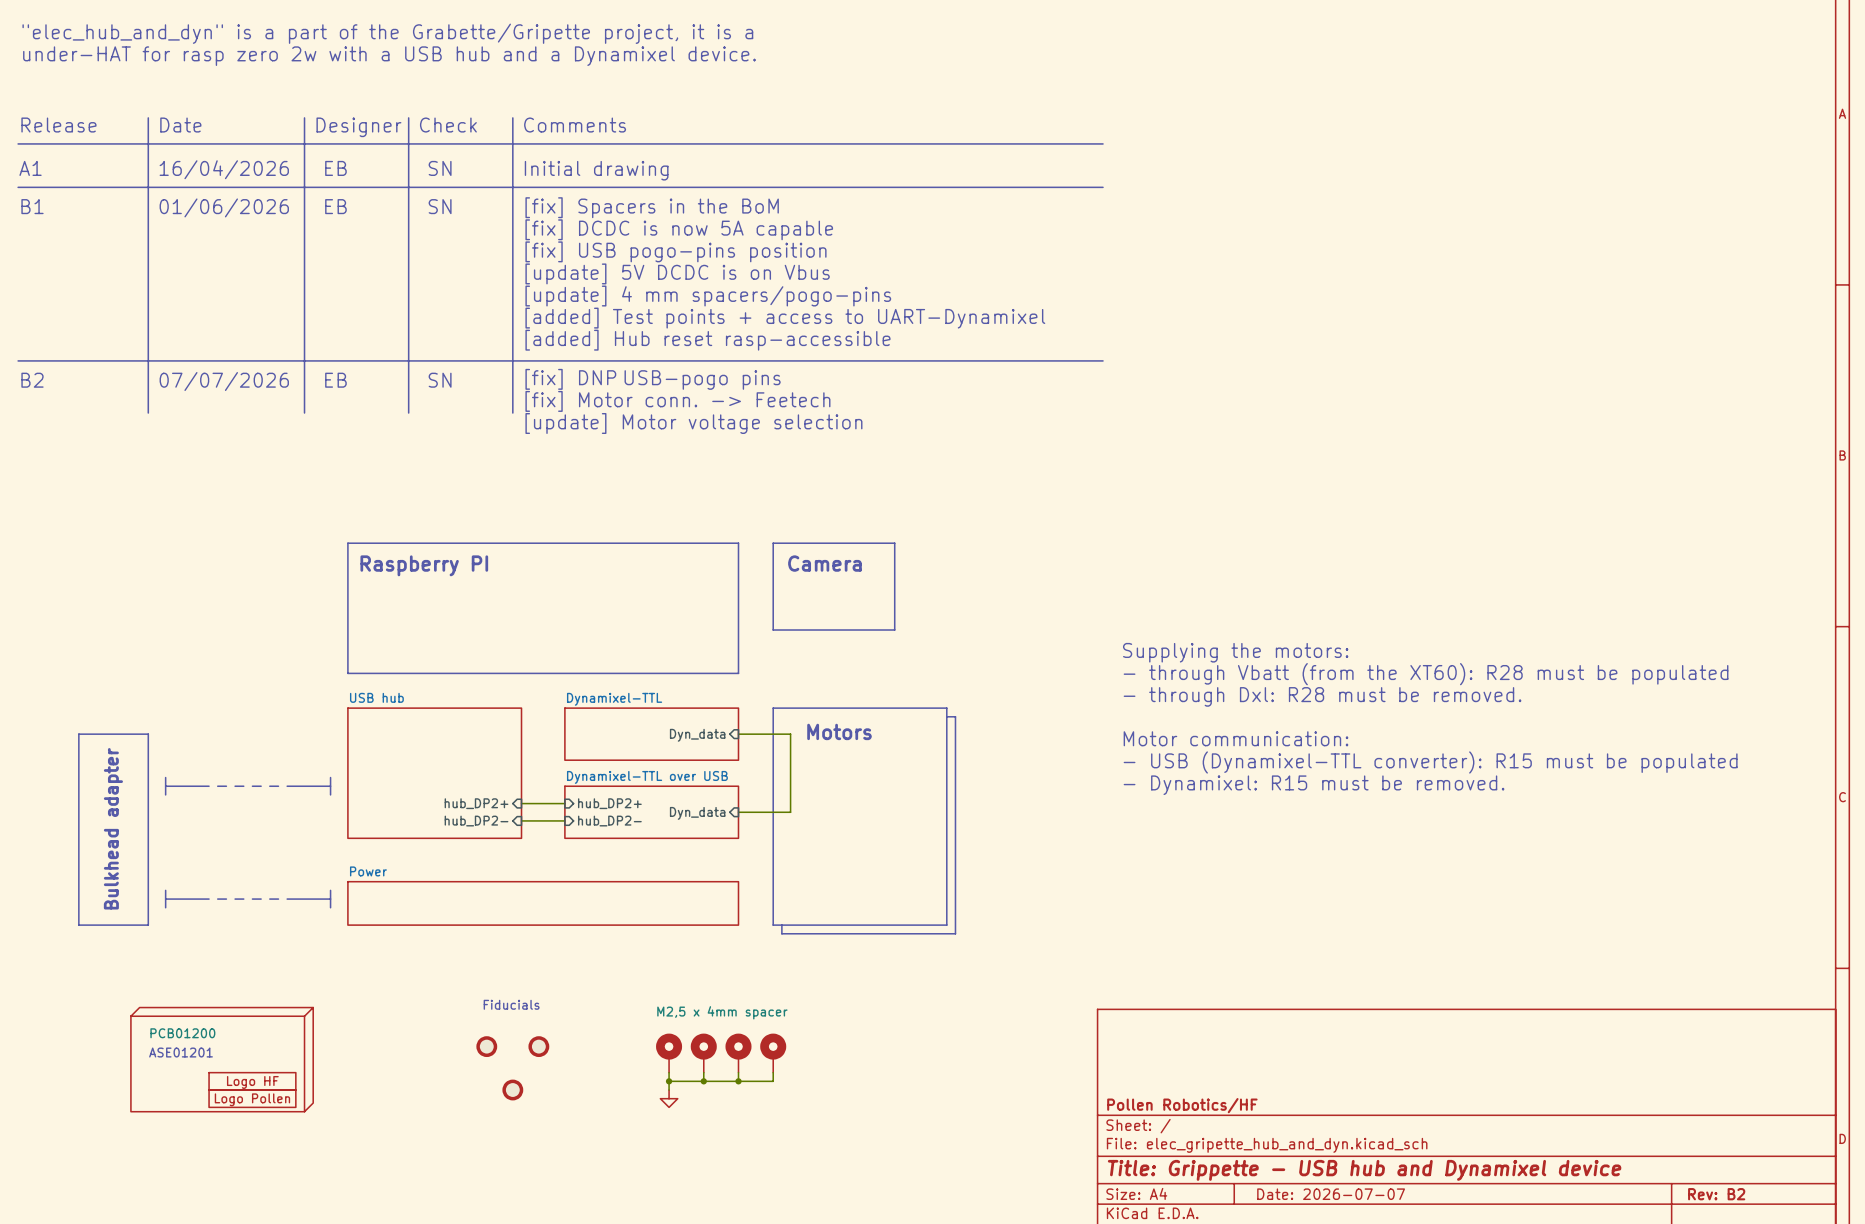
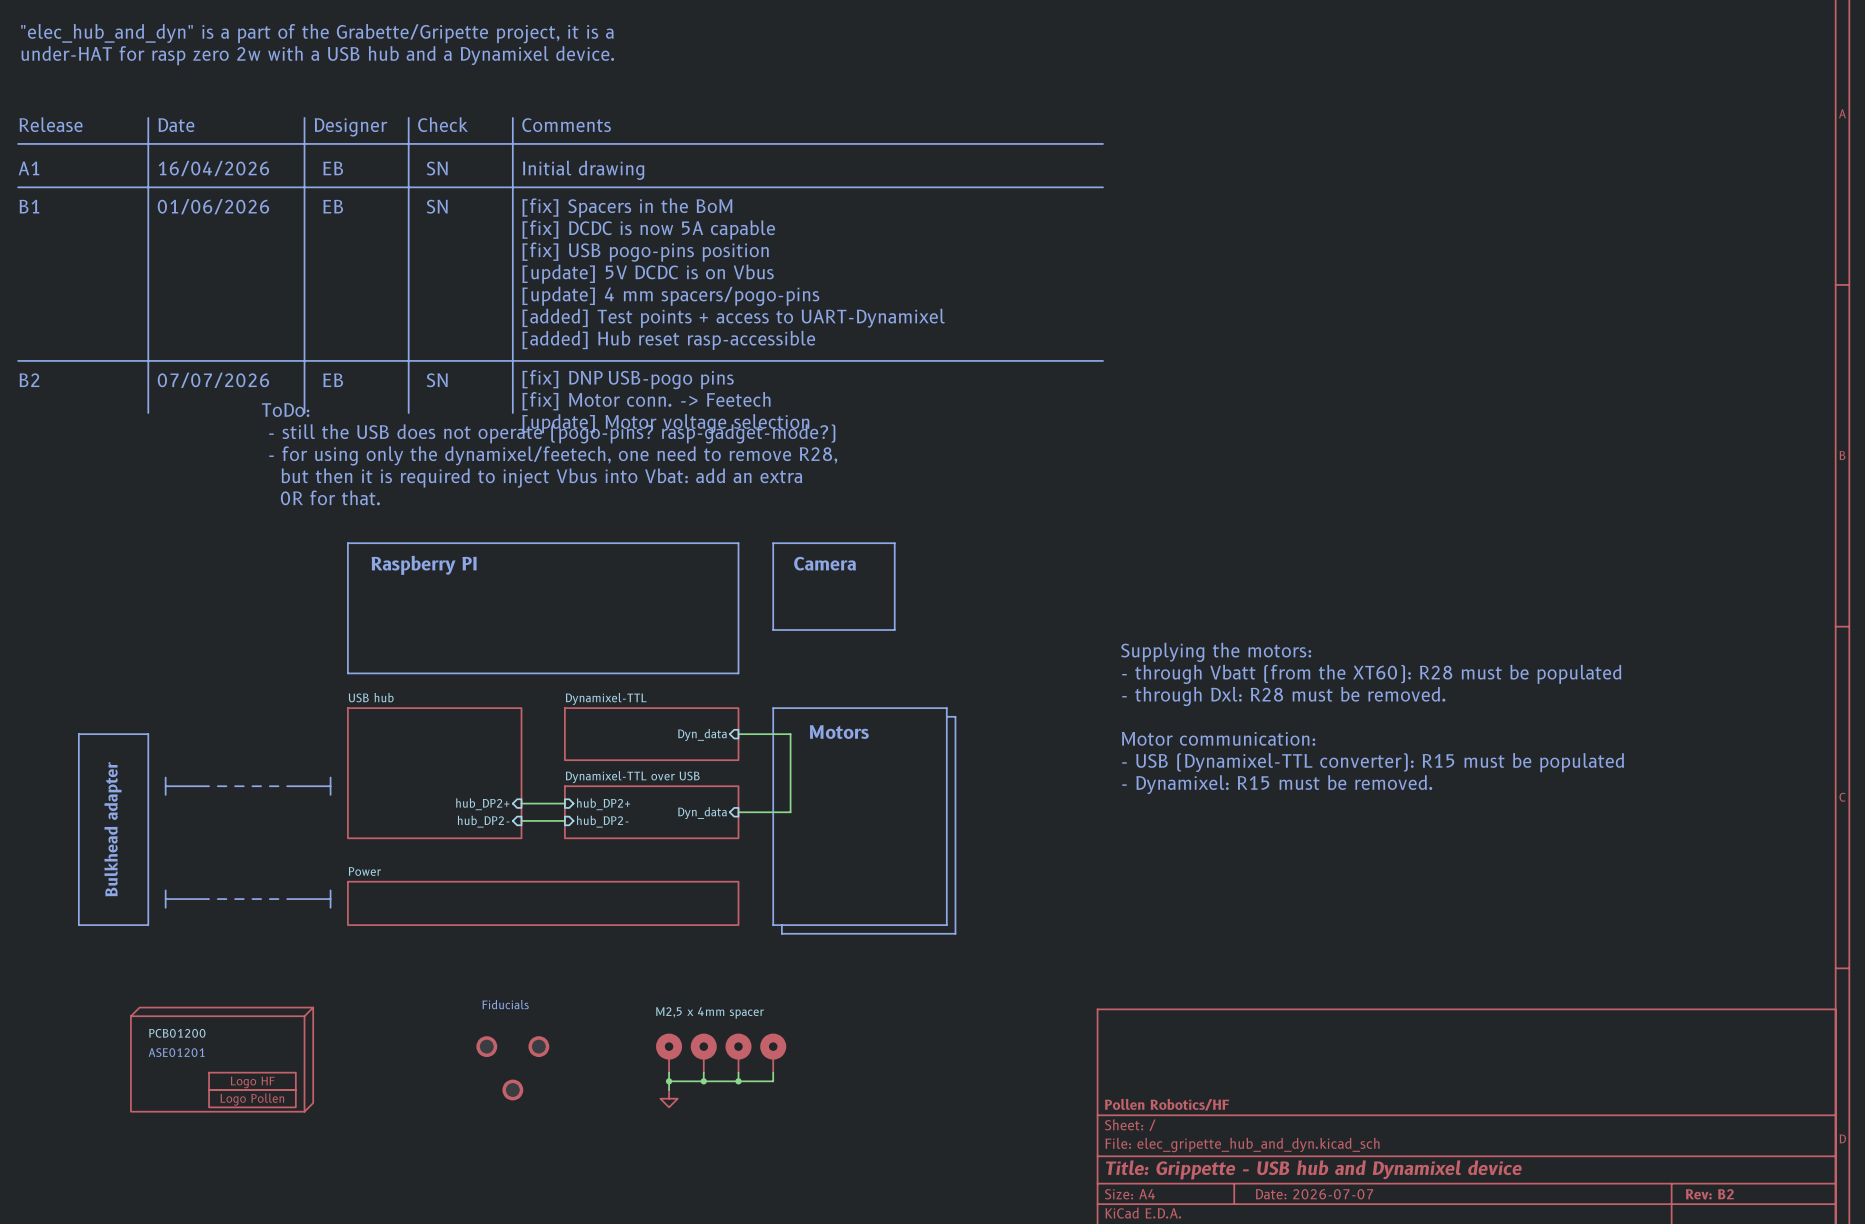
text: none -> ToDo: (285, 410)
text: none -> - still the USB does not operate (pogo-pins? rasp-gadget-mode?) (552, 433)
text: none -> - for using only the dynamixel/feetech, one need to remove R28, (553, 455)
text: none -> but then it is required to inject Vbus into Vbat: add an extra (541, 478)
text: none -> 0R for that. (330, 497)

